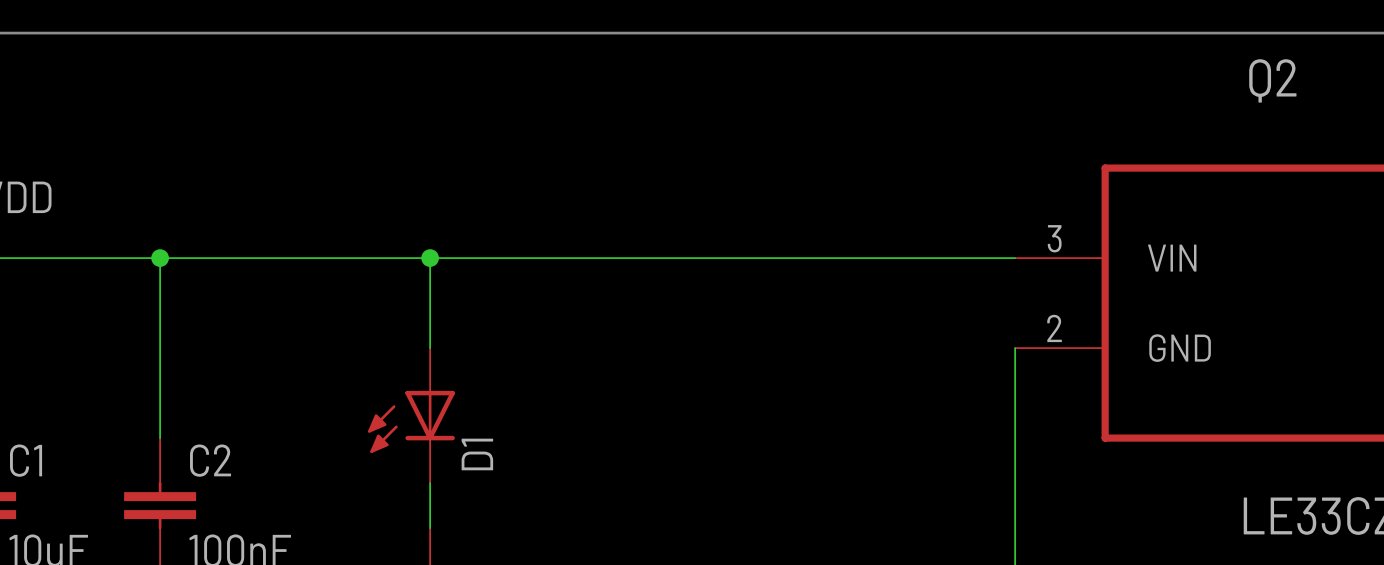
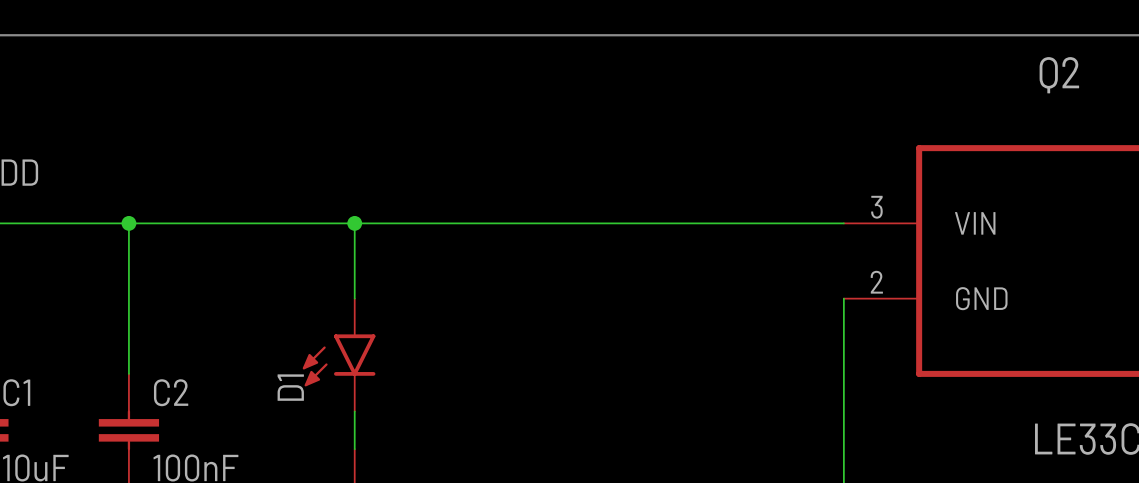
D1 symbol: [368, 348, 455, 484] -> [302, 298, 376, 412]
D1 name position: D1 (477, 454) -> D1 (290, 387)

